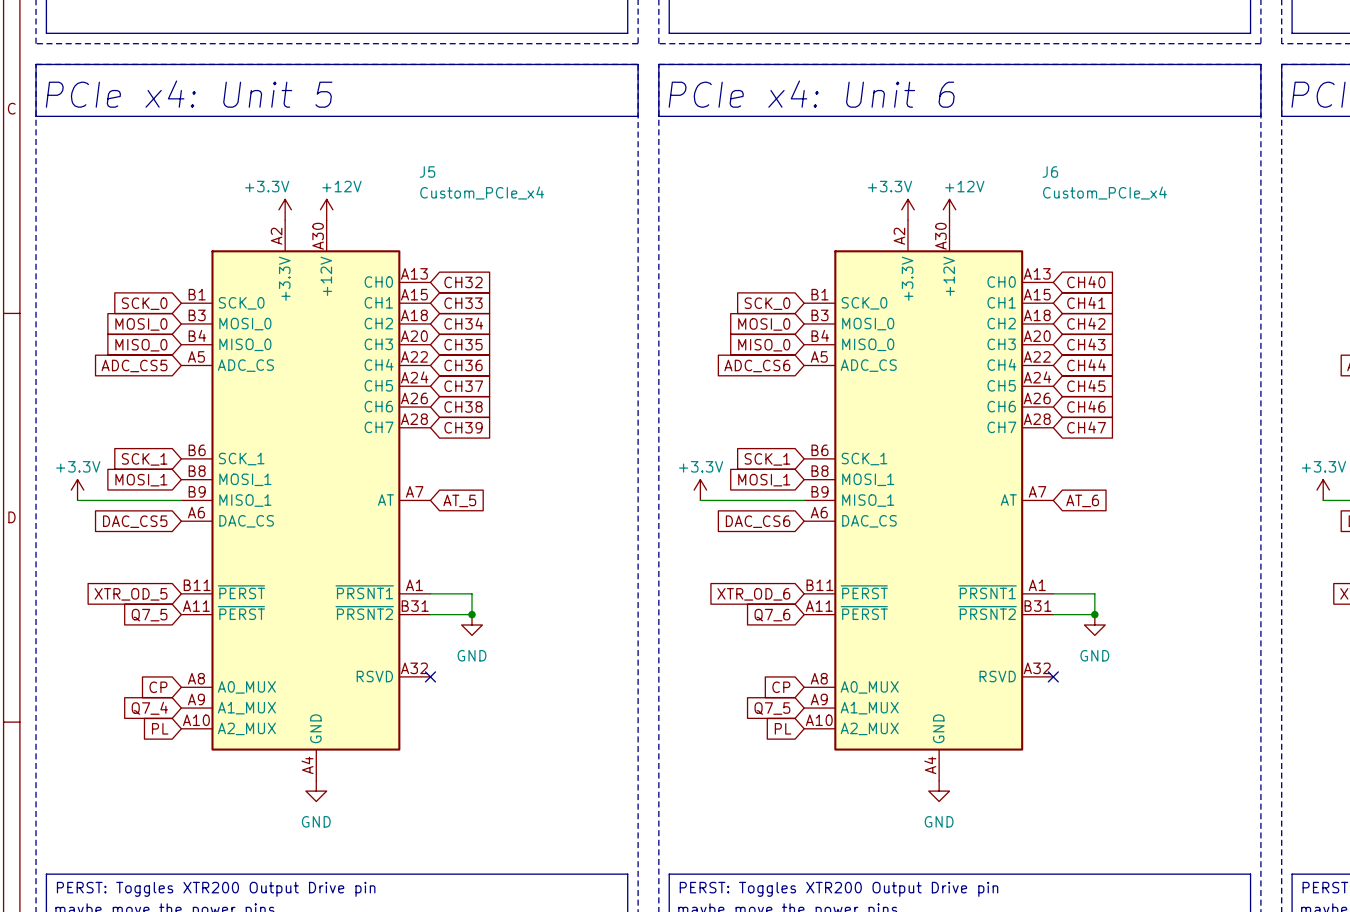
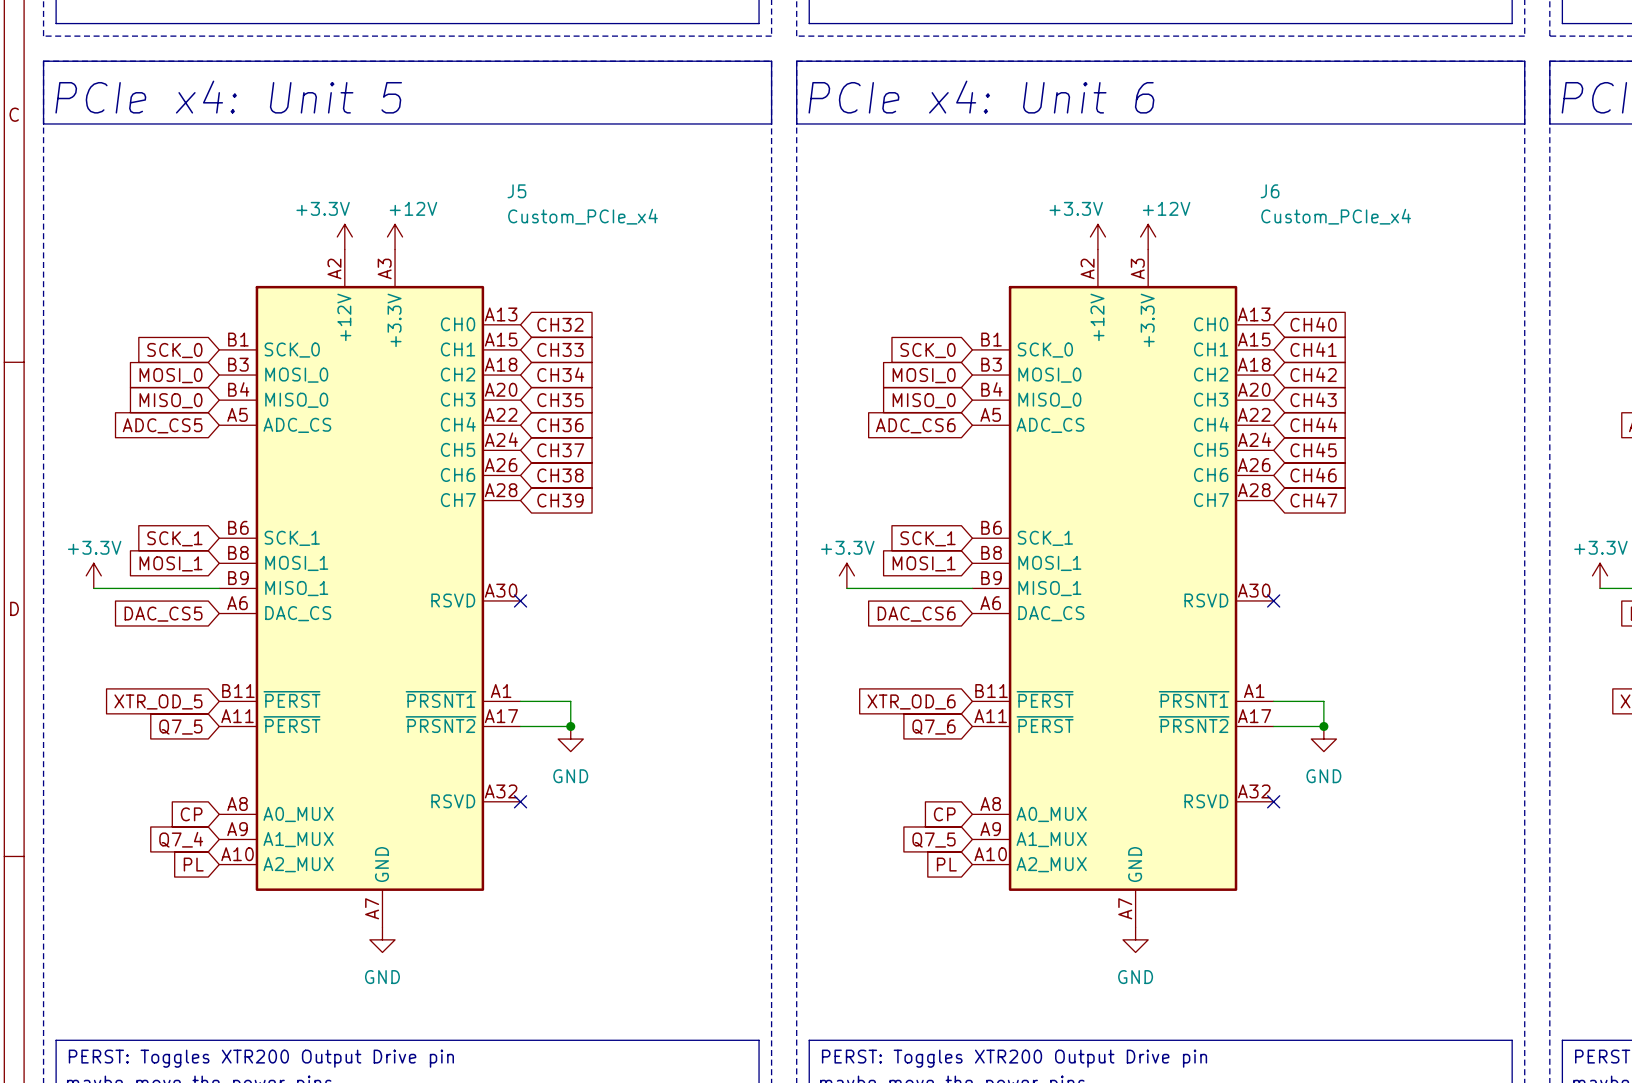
J5 symbol: [181, 220, 431, 781] -> [219, 249, 521, 928]
J6 symbol: [804, 220, 1054, 781] -> [972, 249, 1274, 928]
global label: AT_5 (459, 500) -> none
global label: AT_6 (1082, 500) -> none
no-connect mark: none -> (520, 600)
no-connect mark: none -> (1273, 600)

